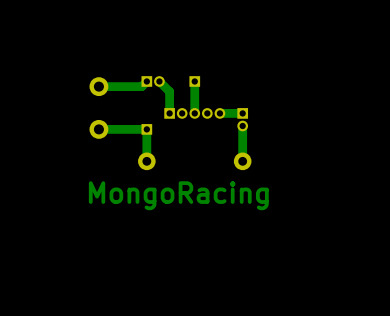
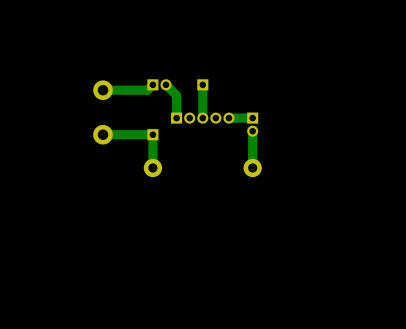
text: MongoRacing (178, 195) -> none

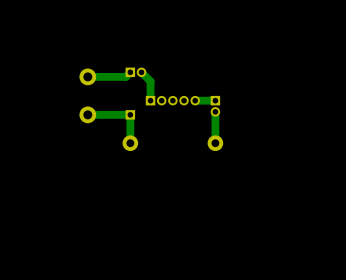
bottom track: (202, 84) (202, 118) -> none
part: (202, 84) -> none

